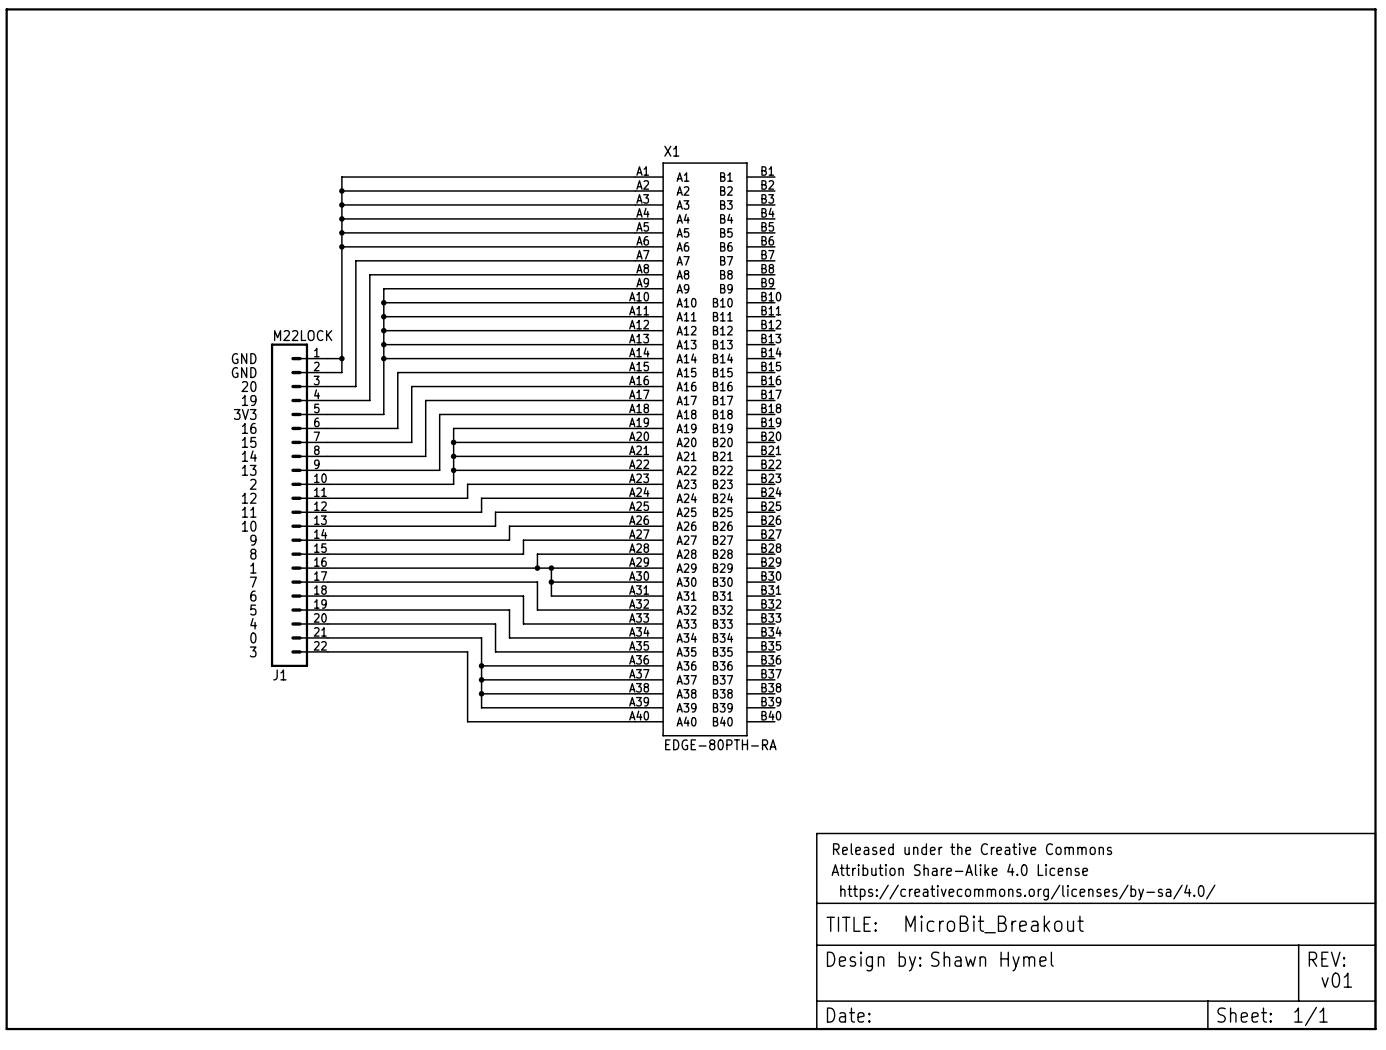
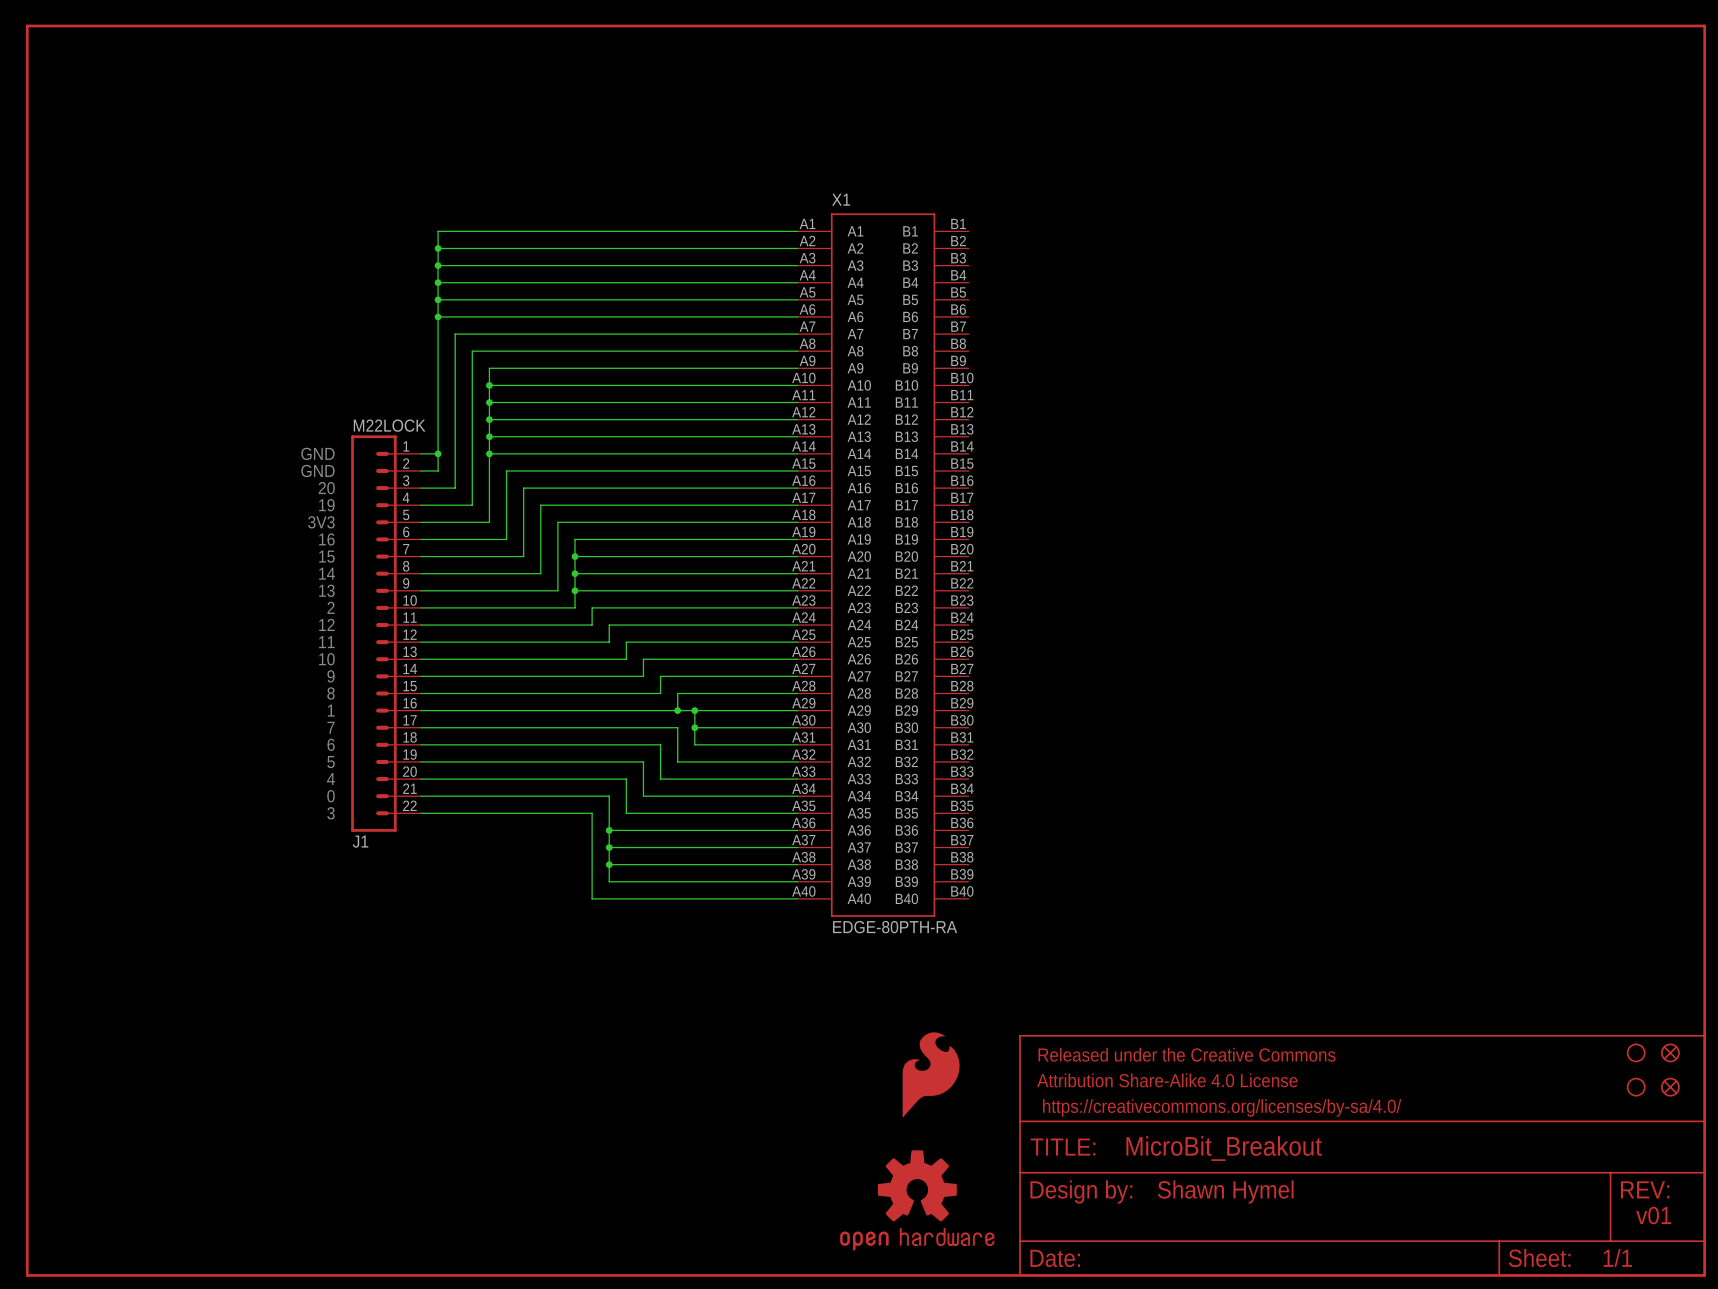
part: none -> (1636, 1052)
part: none -> (1670, 1052)
part: none -> (931, 1075)
part: none -> (1636, 1087)
part: none -> (1670, 1087)
part: none -> (917, 1200)

